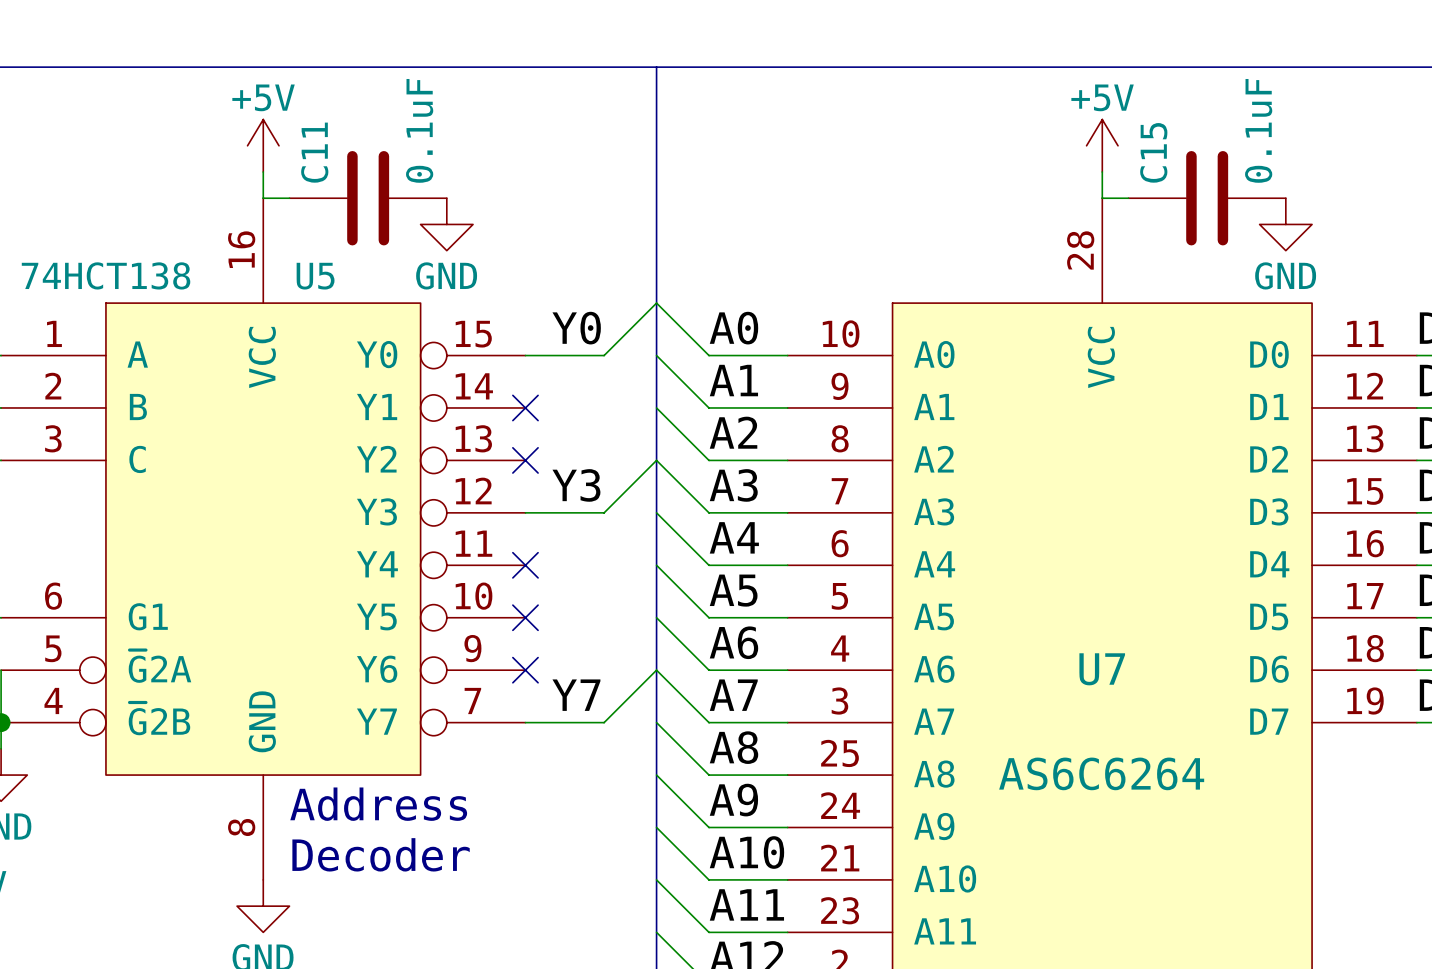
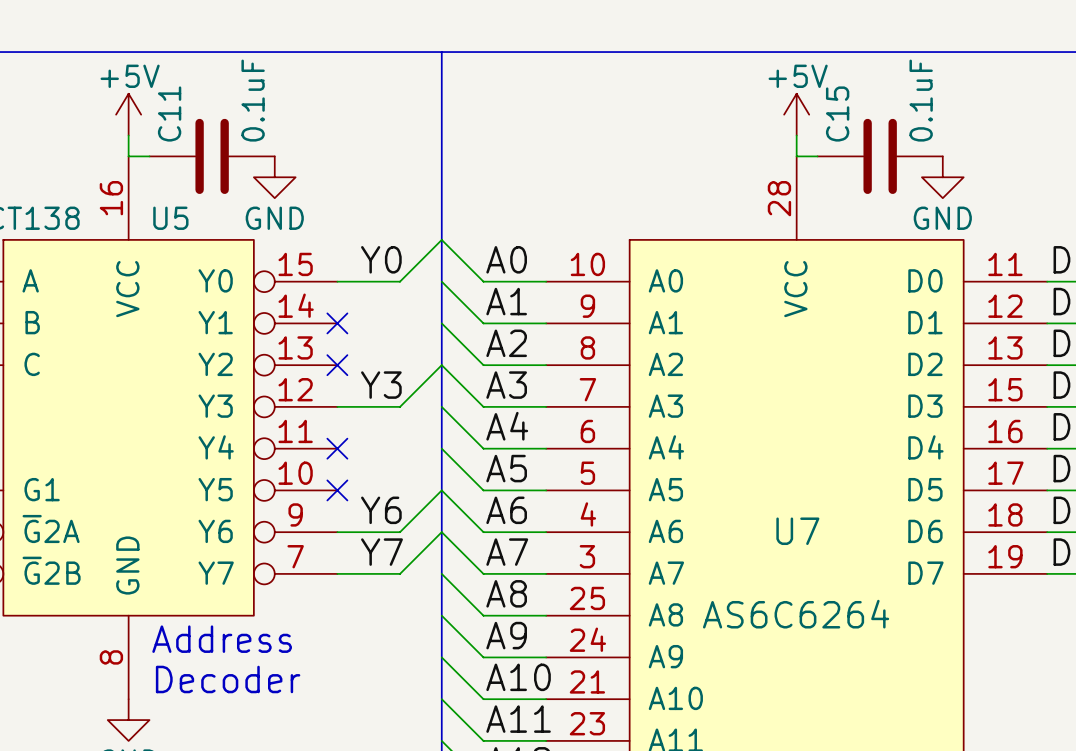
wire: none -> (441, 490) (400, 532) (337, 532)
label: none -> Y6 (381, 510)
no-connect mark: (525, 670) -> none

